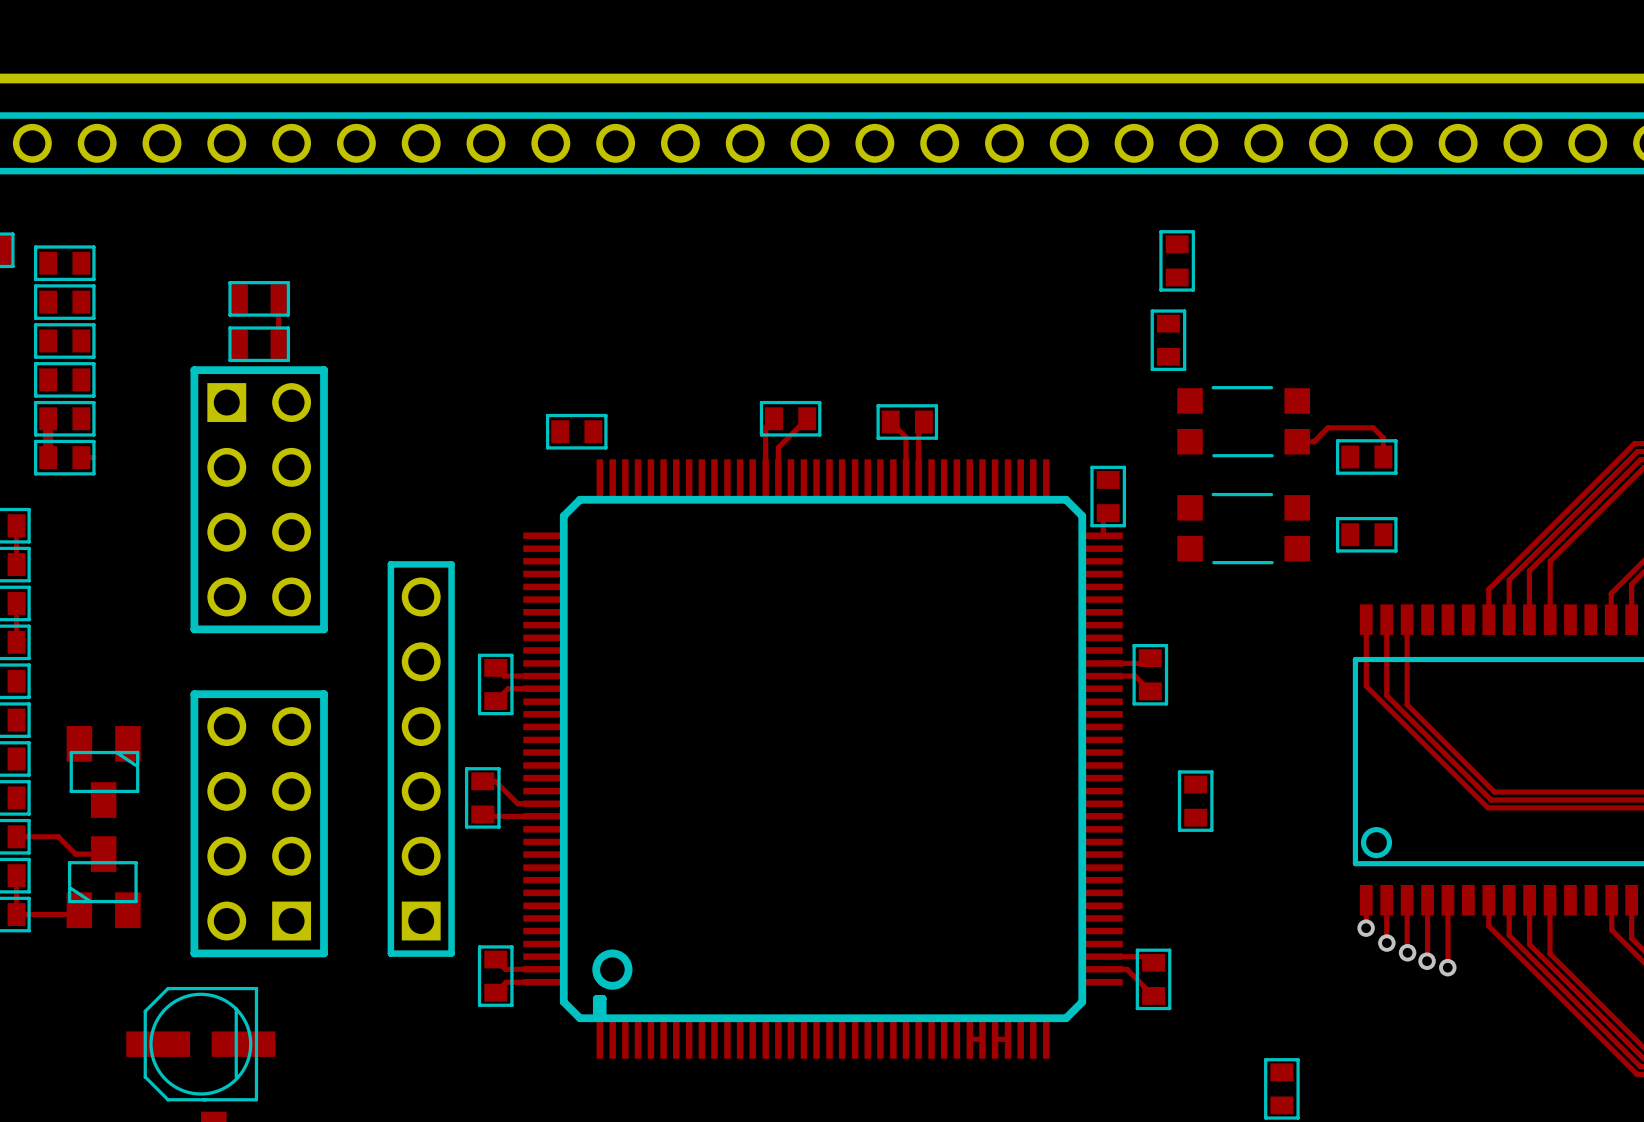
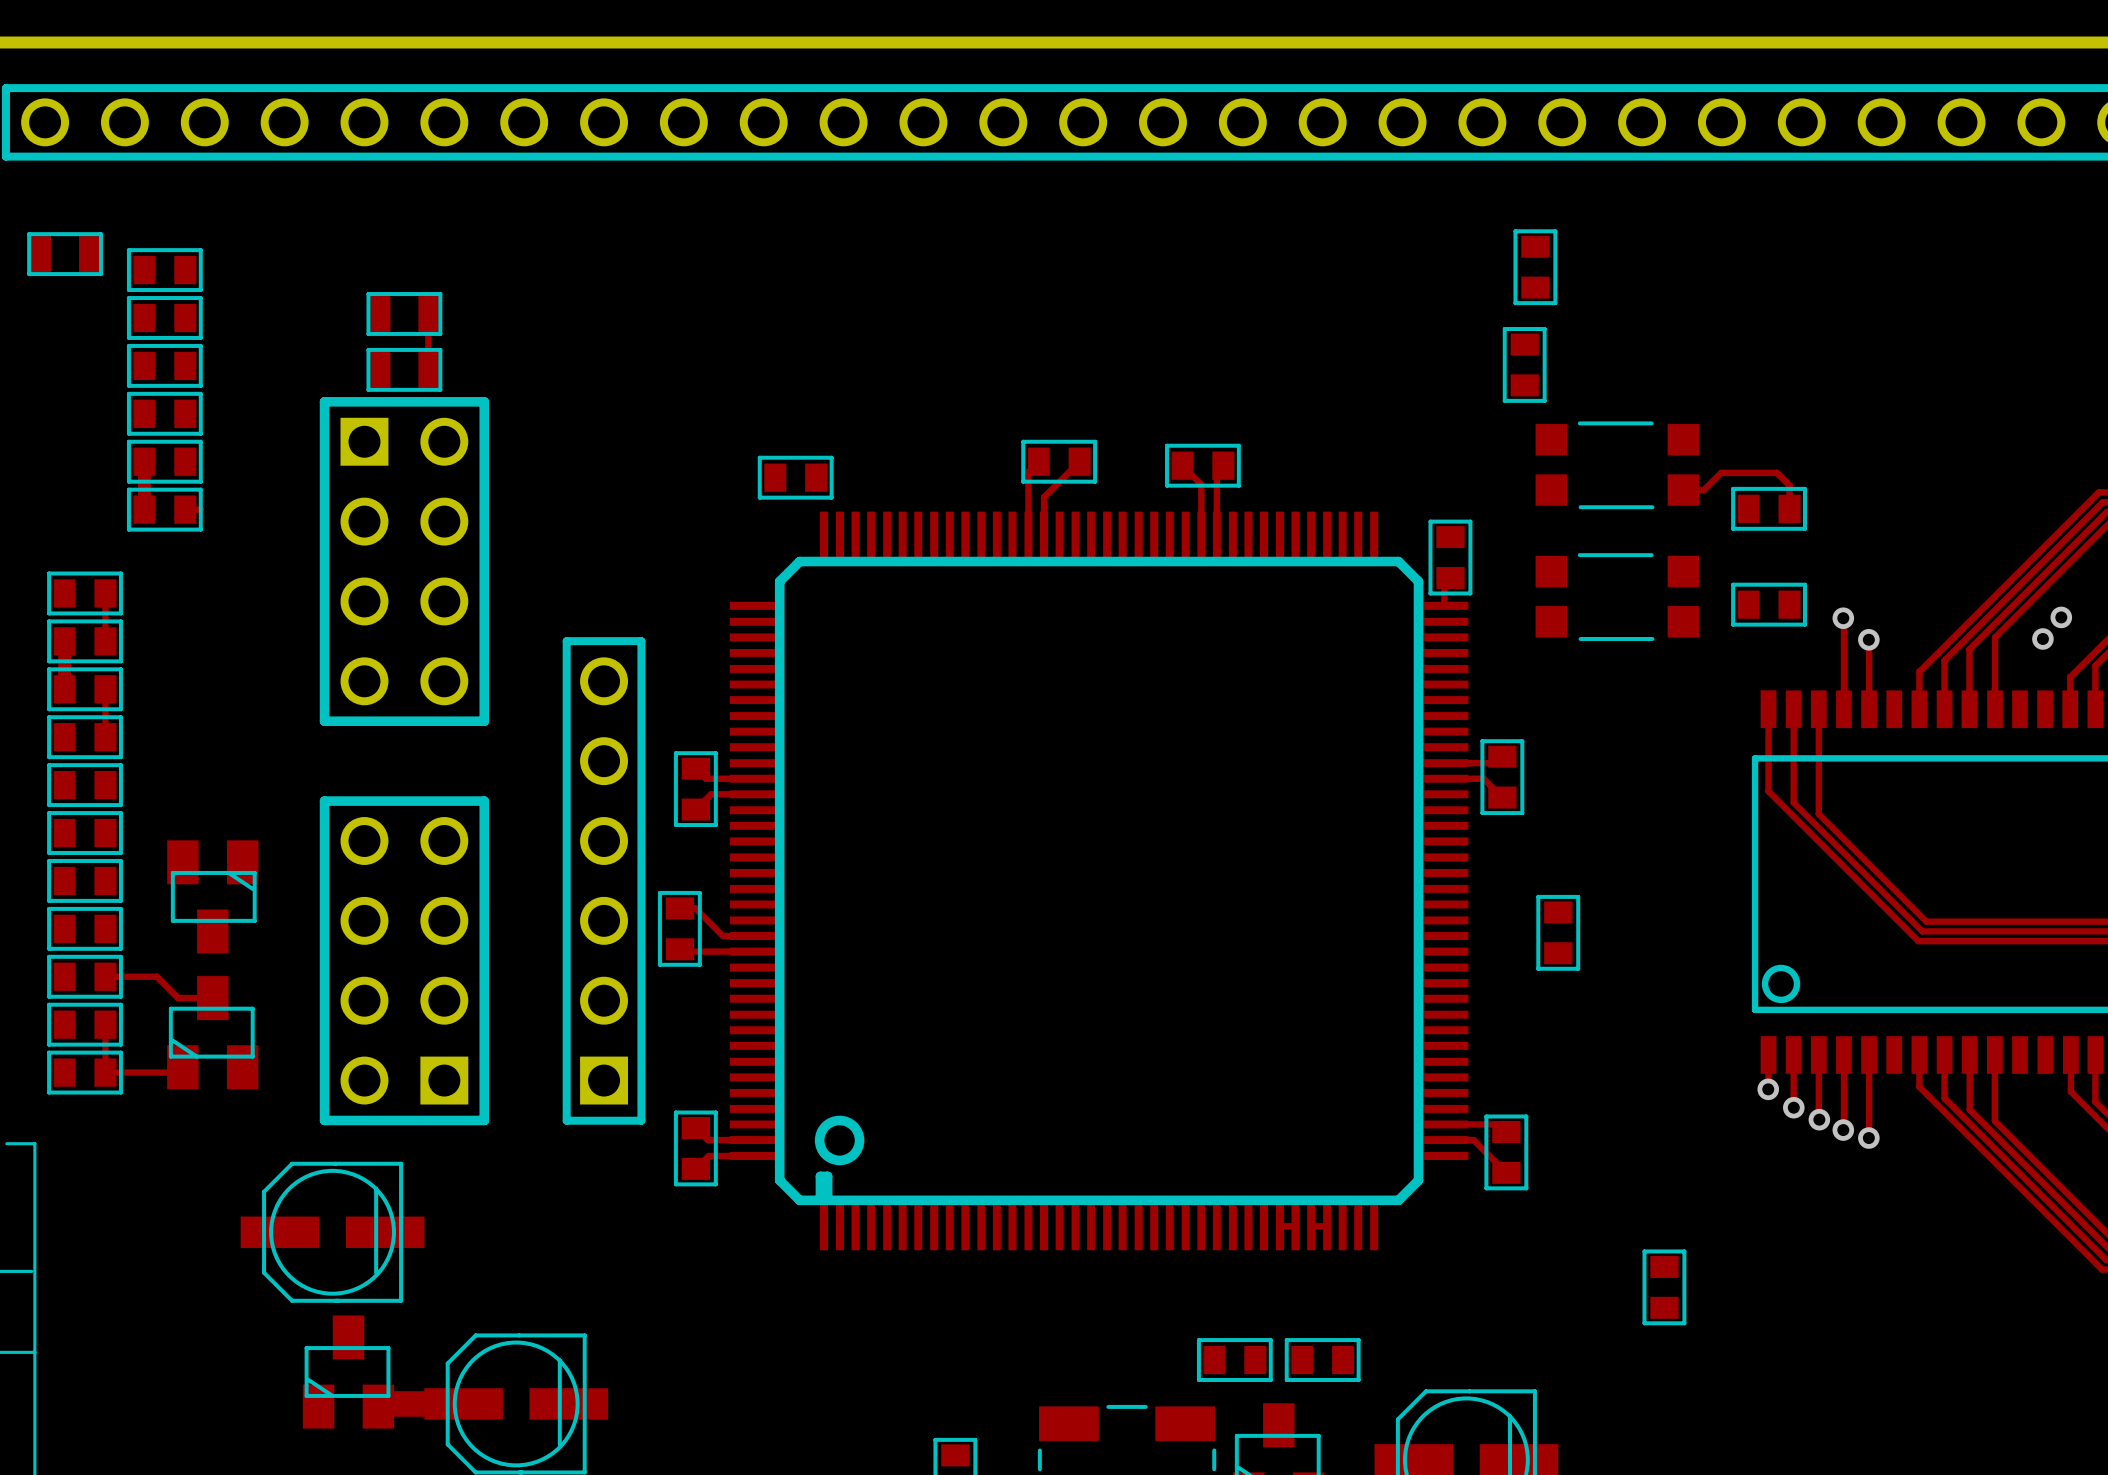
track: none -> (1843, 618) (1843, 709)
via: none -> (1843, 618)
via: none -> (2061, 617)
via: none -> (2042, 638)
track: none -> (1869, 640) (1869, 709)
via: none -> (1868, 639)

